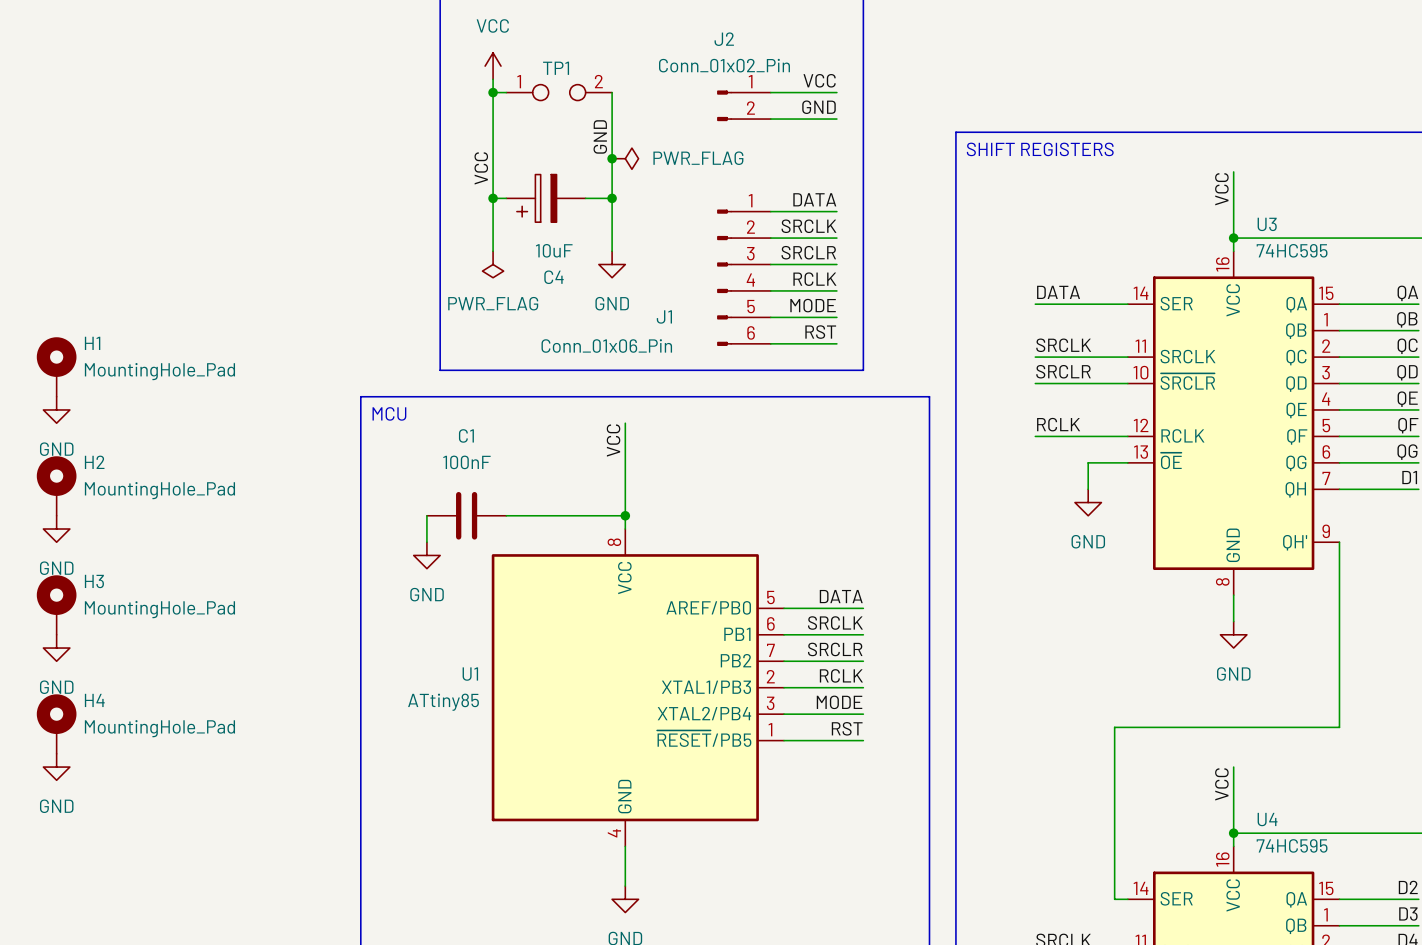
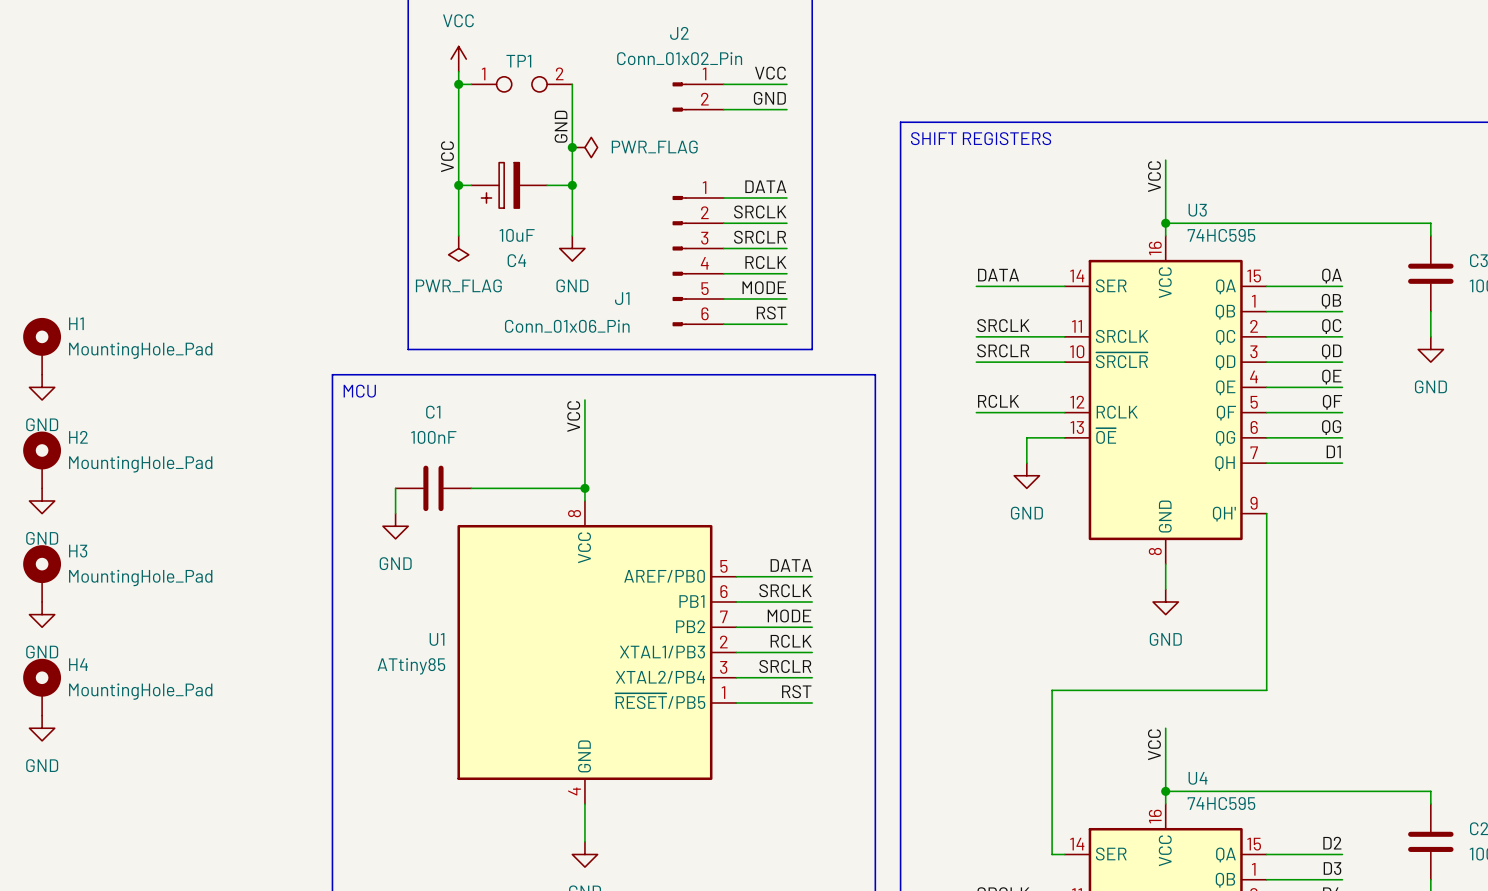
label: SRCLR (835, 649) -> MODE (789, 615)
label: MODE (839, 702) -> SRCLR (785, 666)

